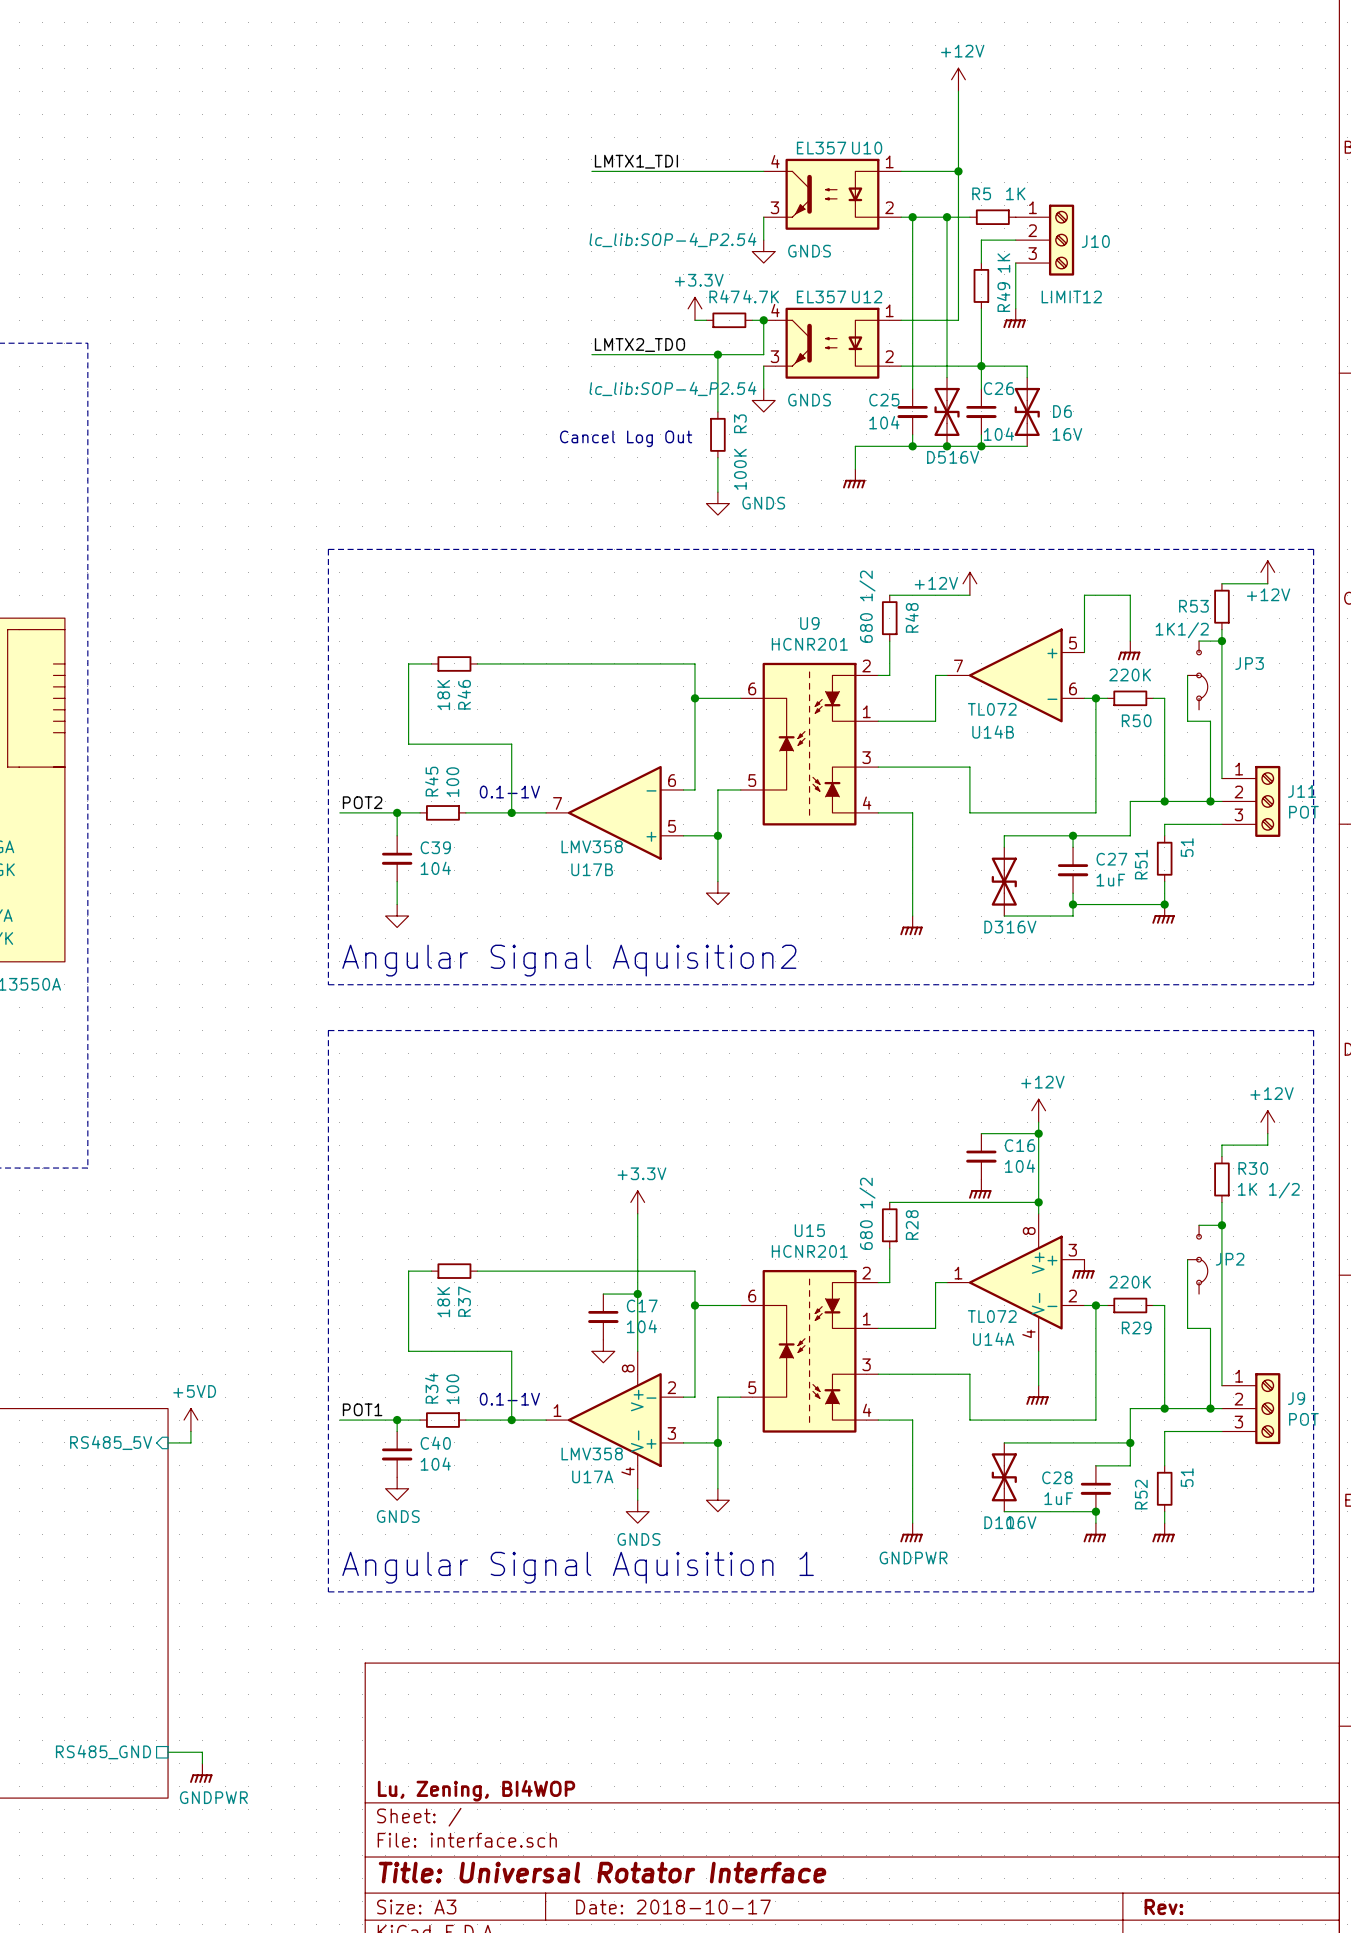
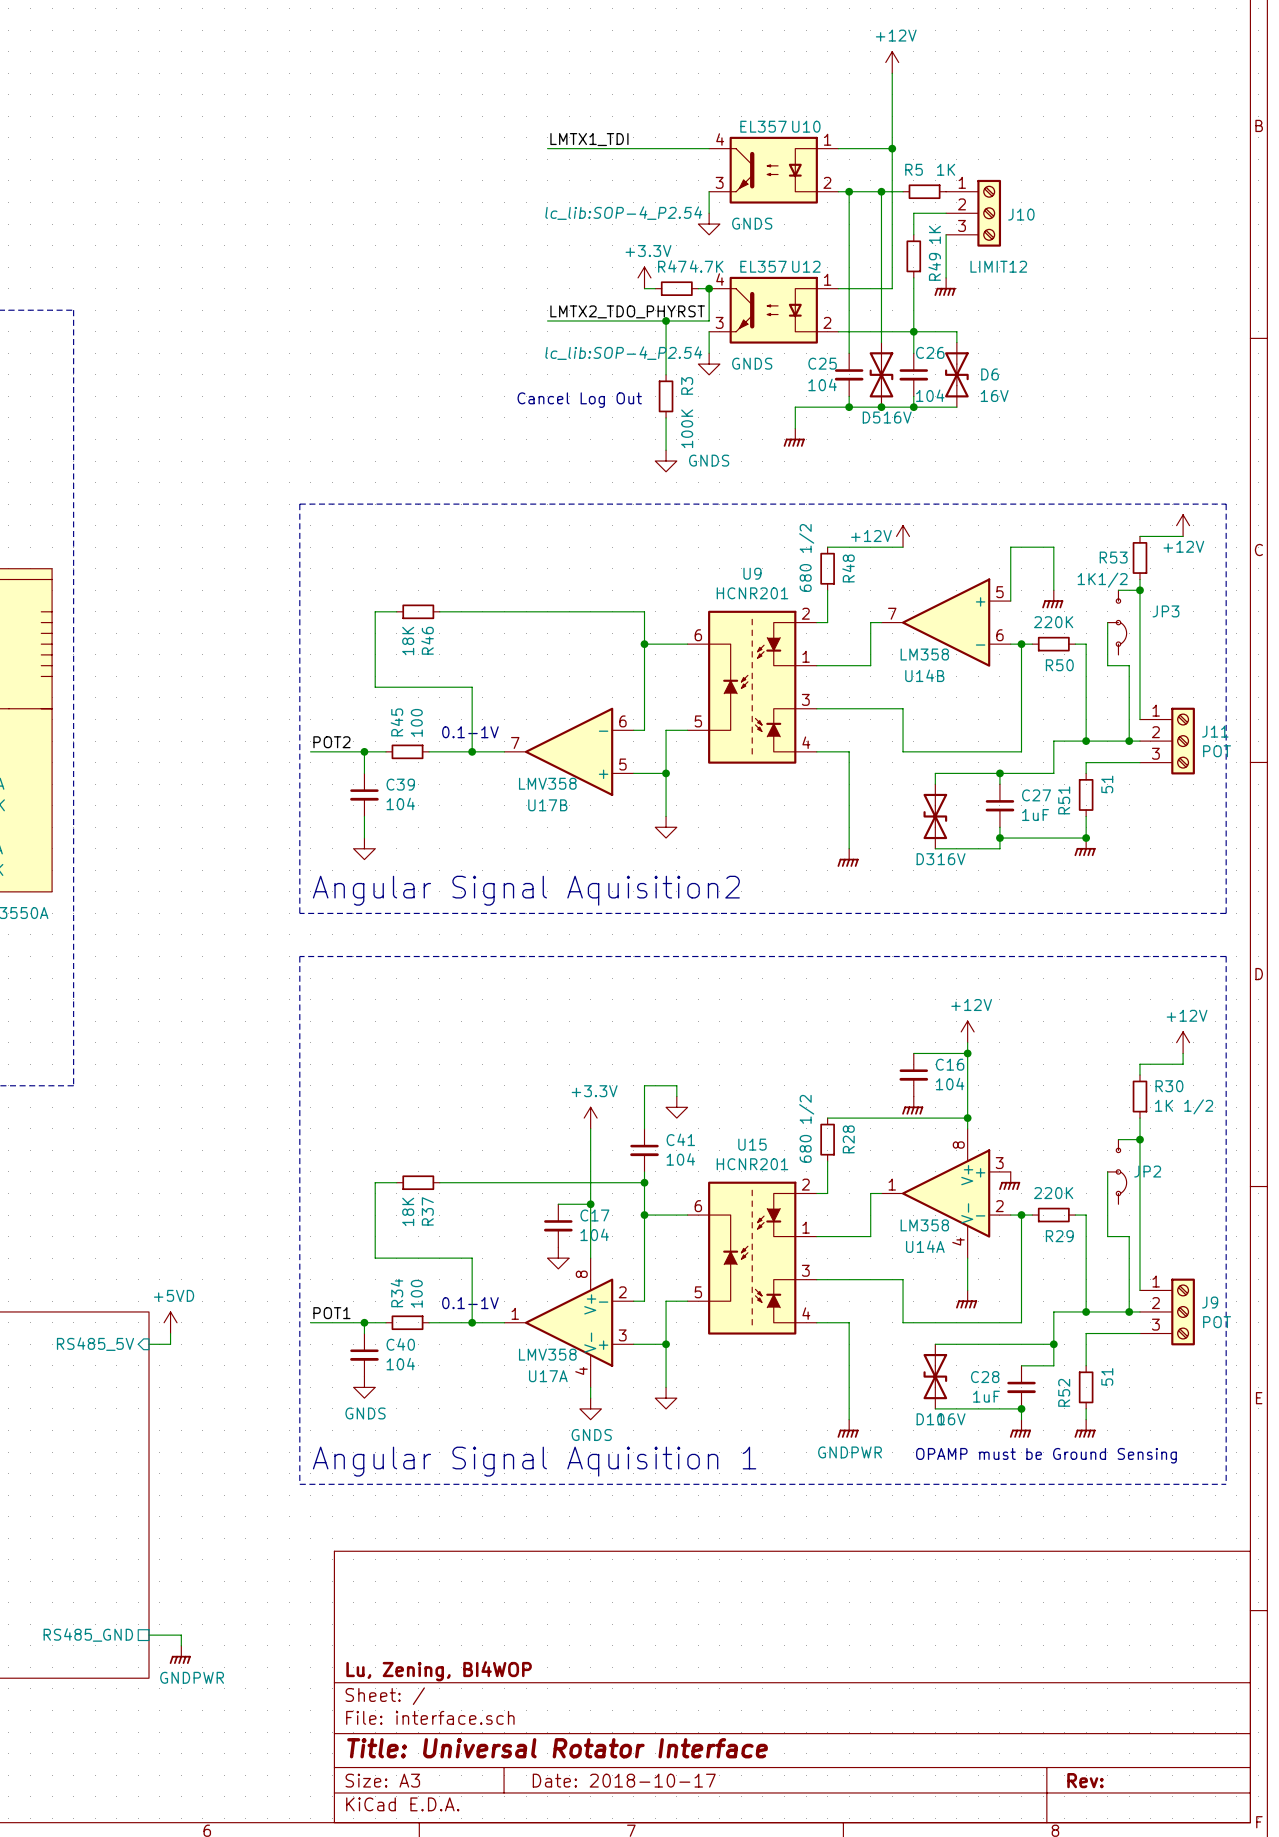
label: LMTX2_TDO (639, 345) -> LMTX2_TDO_PHYRST (627, 311)
U14B value: TL072 (992, 709) -> LM358 (924, 654)
wire: none -> (676, 1096) (676, 1085) (644, 1085) (644, 1128)
power symbol: none -> (676, 1107)
C41: none -> 104 (644, 1150)
wire: none -> (644, 1171) (644, 1182)
junction: none -> (644, 1182)
U14A value: TL072 (992, 1316) -> LM358 (924, 1225)
text: none -> OPAMP must be Ground Sensing (1046, 1455)

